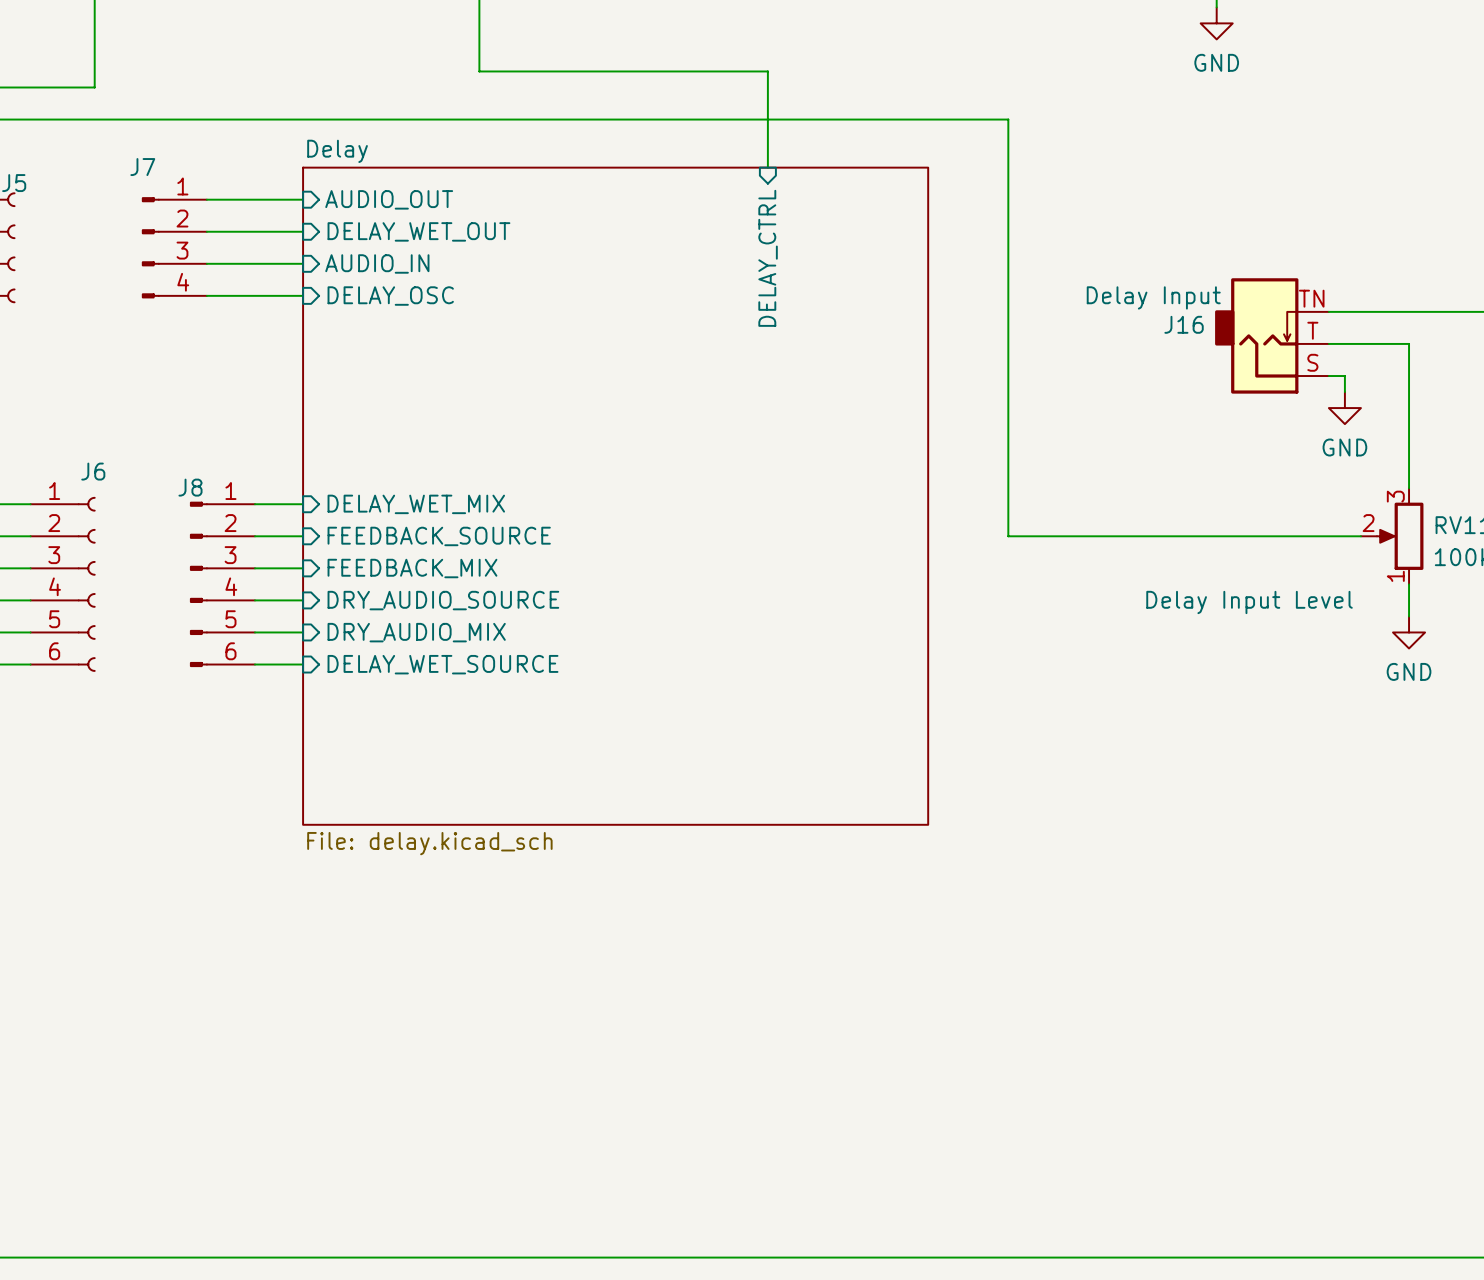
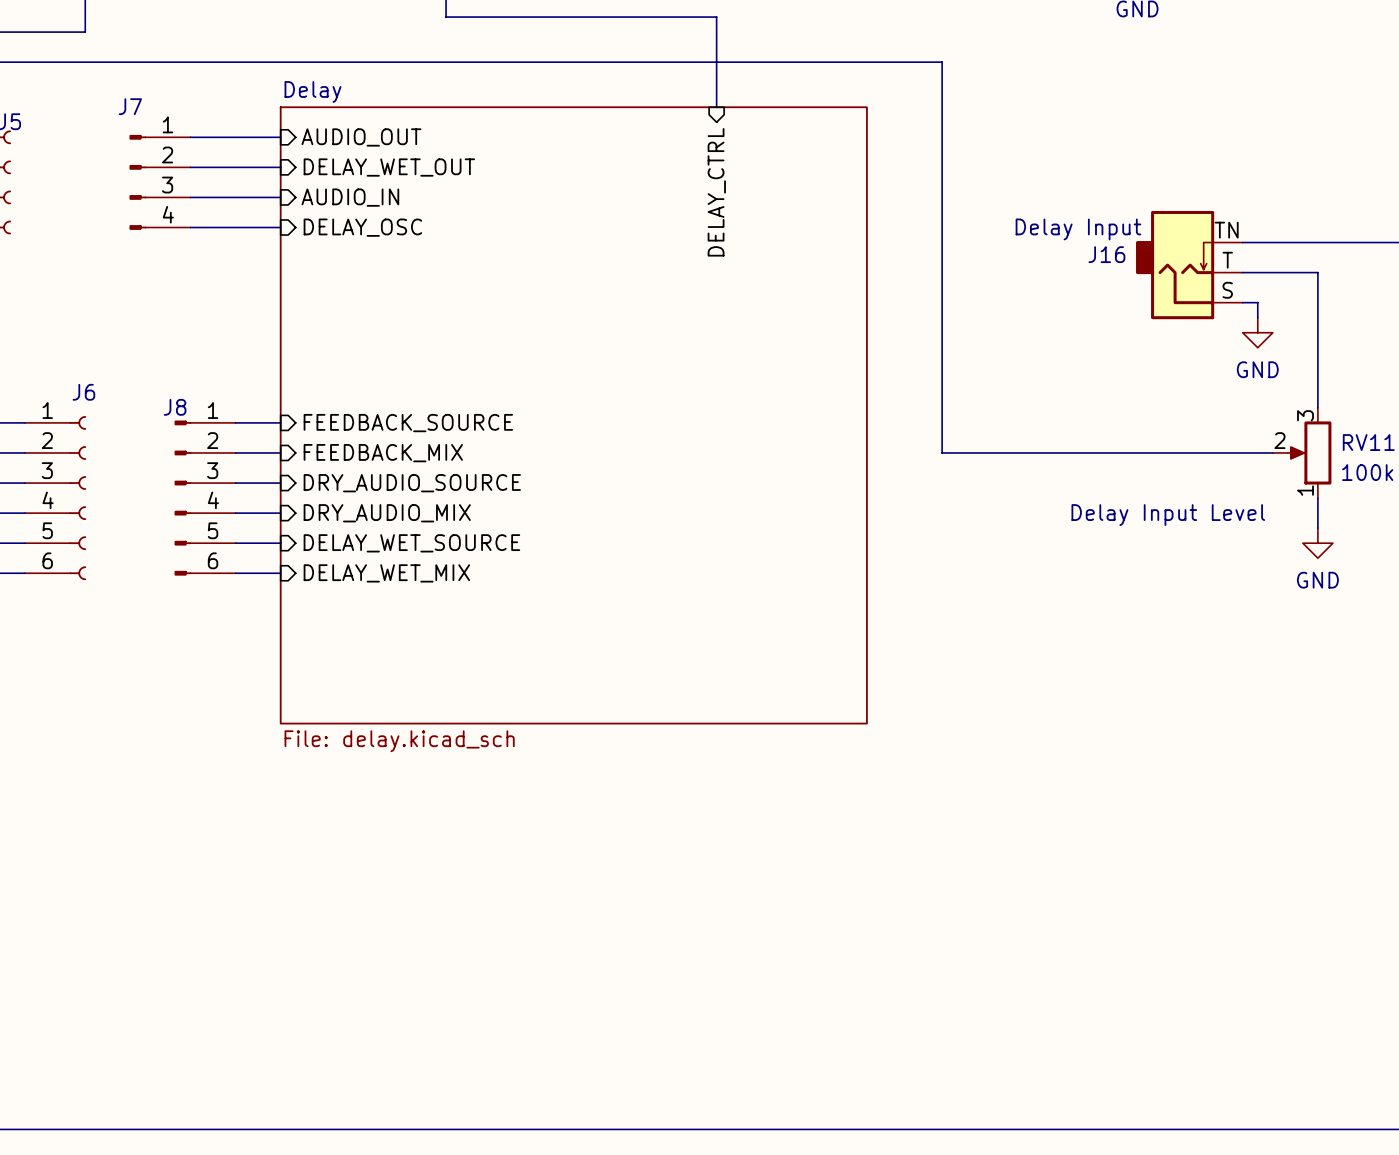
sheet pin: DELAY_WET_MIX (416, 504) -> FEEDBACK_SOURCE (408, 423)
sheet pin: FEEDBACK_SOURCE (439, 536) -> FEEDBACK_MIX (383, 453)
sheet pin: FEEDBACK_MIX (412, 568) -> DRY_AUDIO_SOURCE (412, 483)
sheet pin: DRY_AUDIO_SOURCE (443, 600) -> DRY_AUDIO_MIX (387, 513)
sheet pin: DRY_AUDIO_MIX (416, 632) -> DELAY_WET_SOURCE (411, 543)
sheet pin: DELAY_WET_SOURCE (443, 664) -> DELAY_WET_MIX (386, 573)

